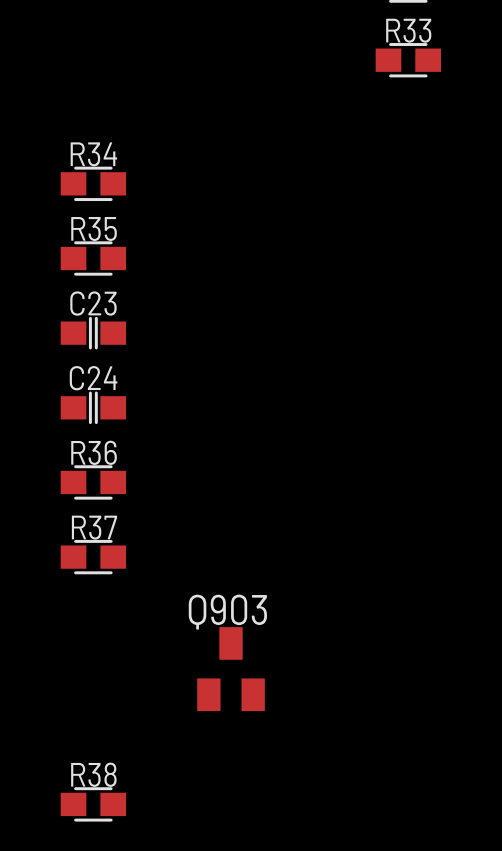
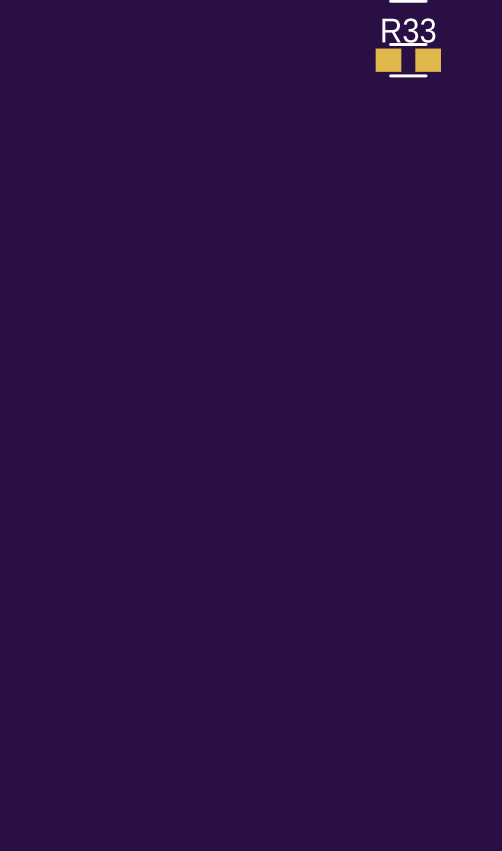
R34: (93, 183) -> none
R35: (93, 258) -> none
C23: (93, 333) -> none
C24: (93, 407) -> none
R36: (93, 482) -> none
R37: (93, 557) -> none
Q903: (231, 669) -> none
R38: (93, 804) -> none

